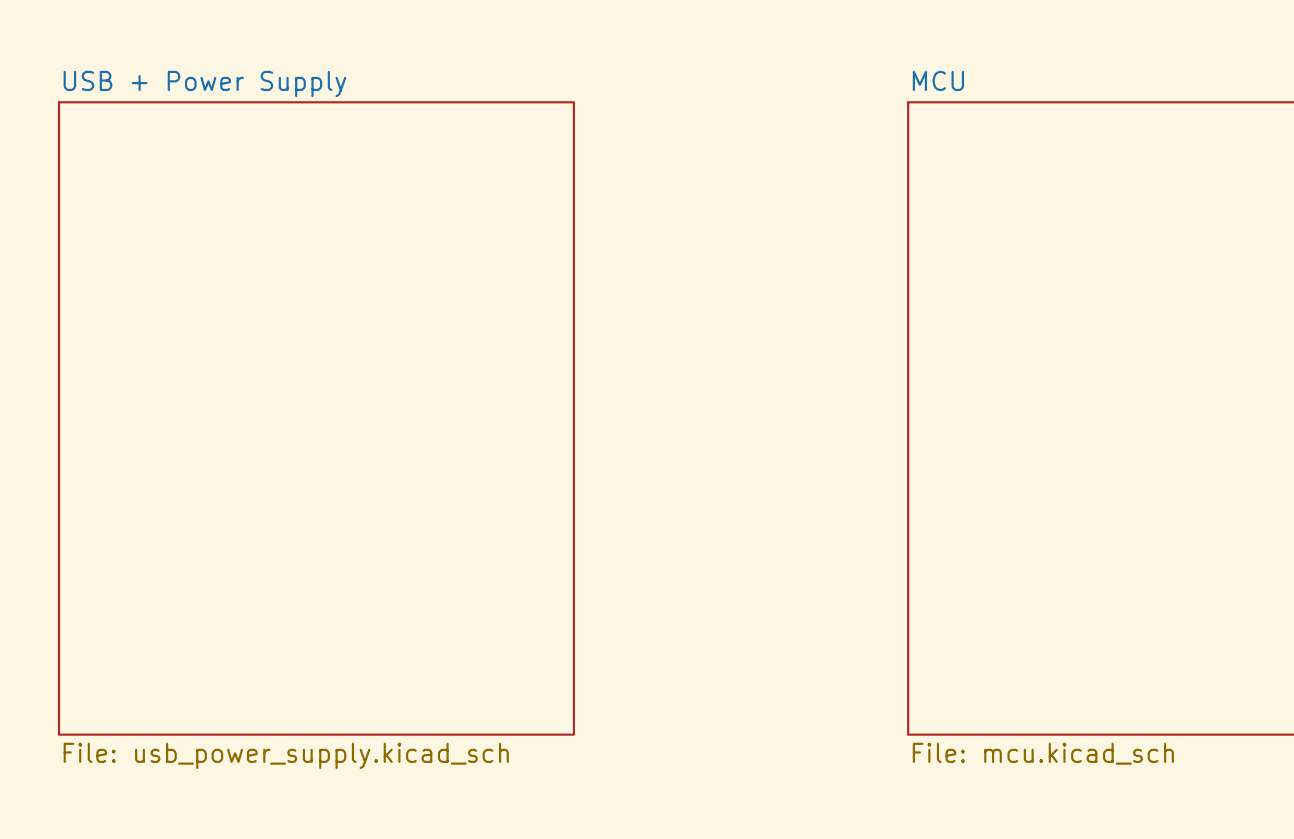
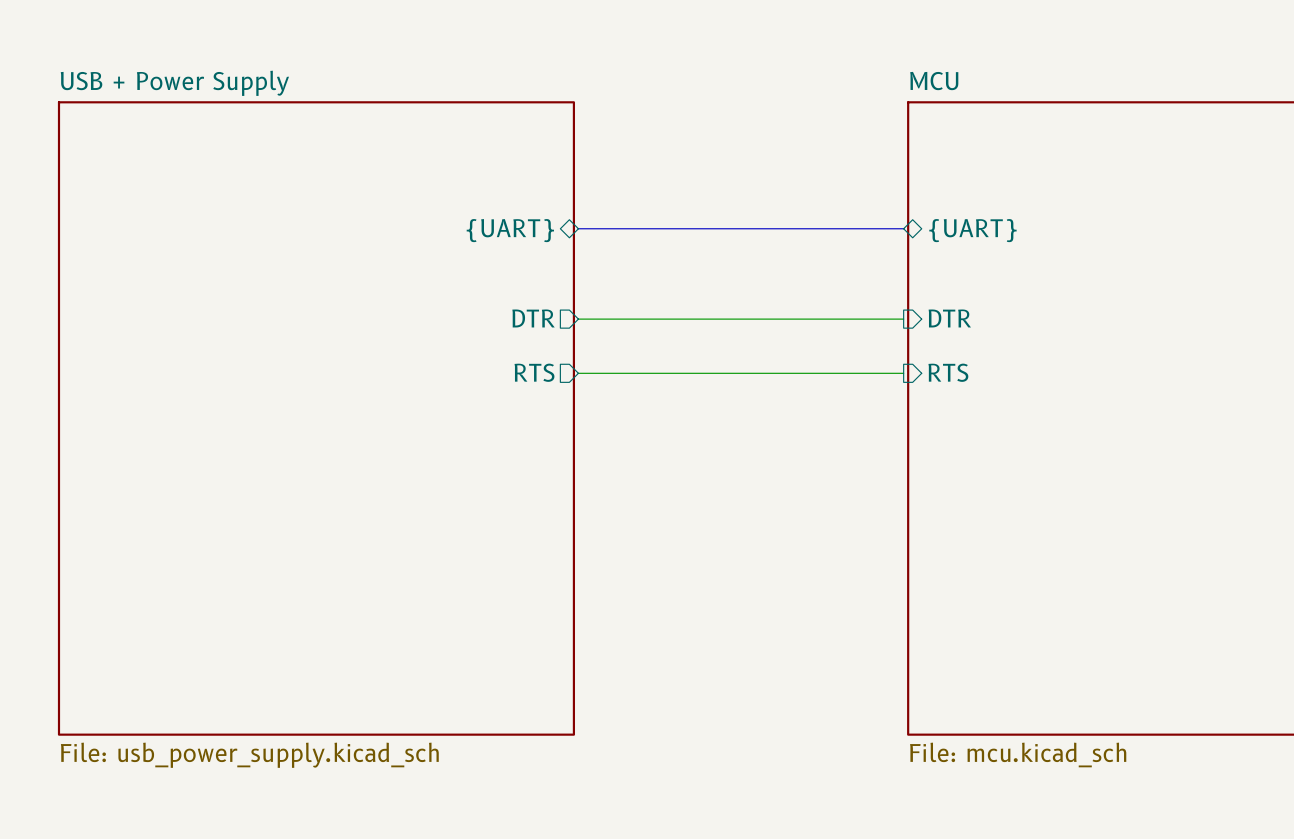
bus: none -> (578, 228) (903, 228)
sheet pin: none -> {UART} (510, 230)
sheet pin: none -> {UART} (972, 230)
sheet pin: none -> DTR (533, 318)
sheet pin: none -> DTR (949, 318)
wire: none -> (578, 319) (903, 319)
sheet pin: none -> RTS (534, 372)
sheet pin: none -> RTS (948, 372)
wire: none -> (578, 373) (903, 373)

